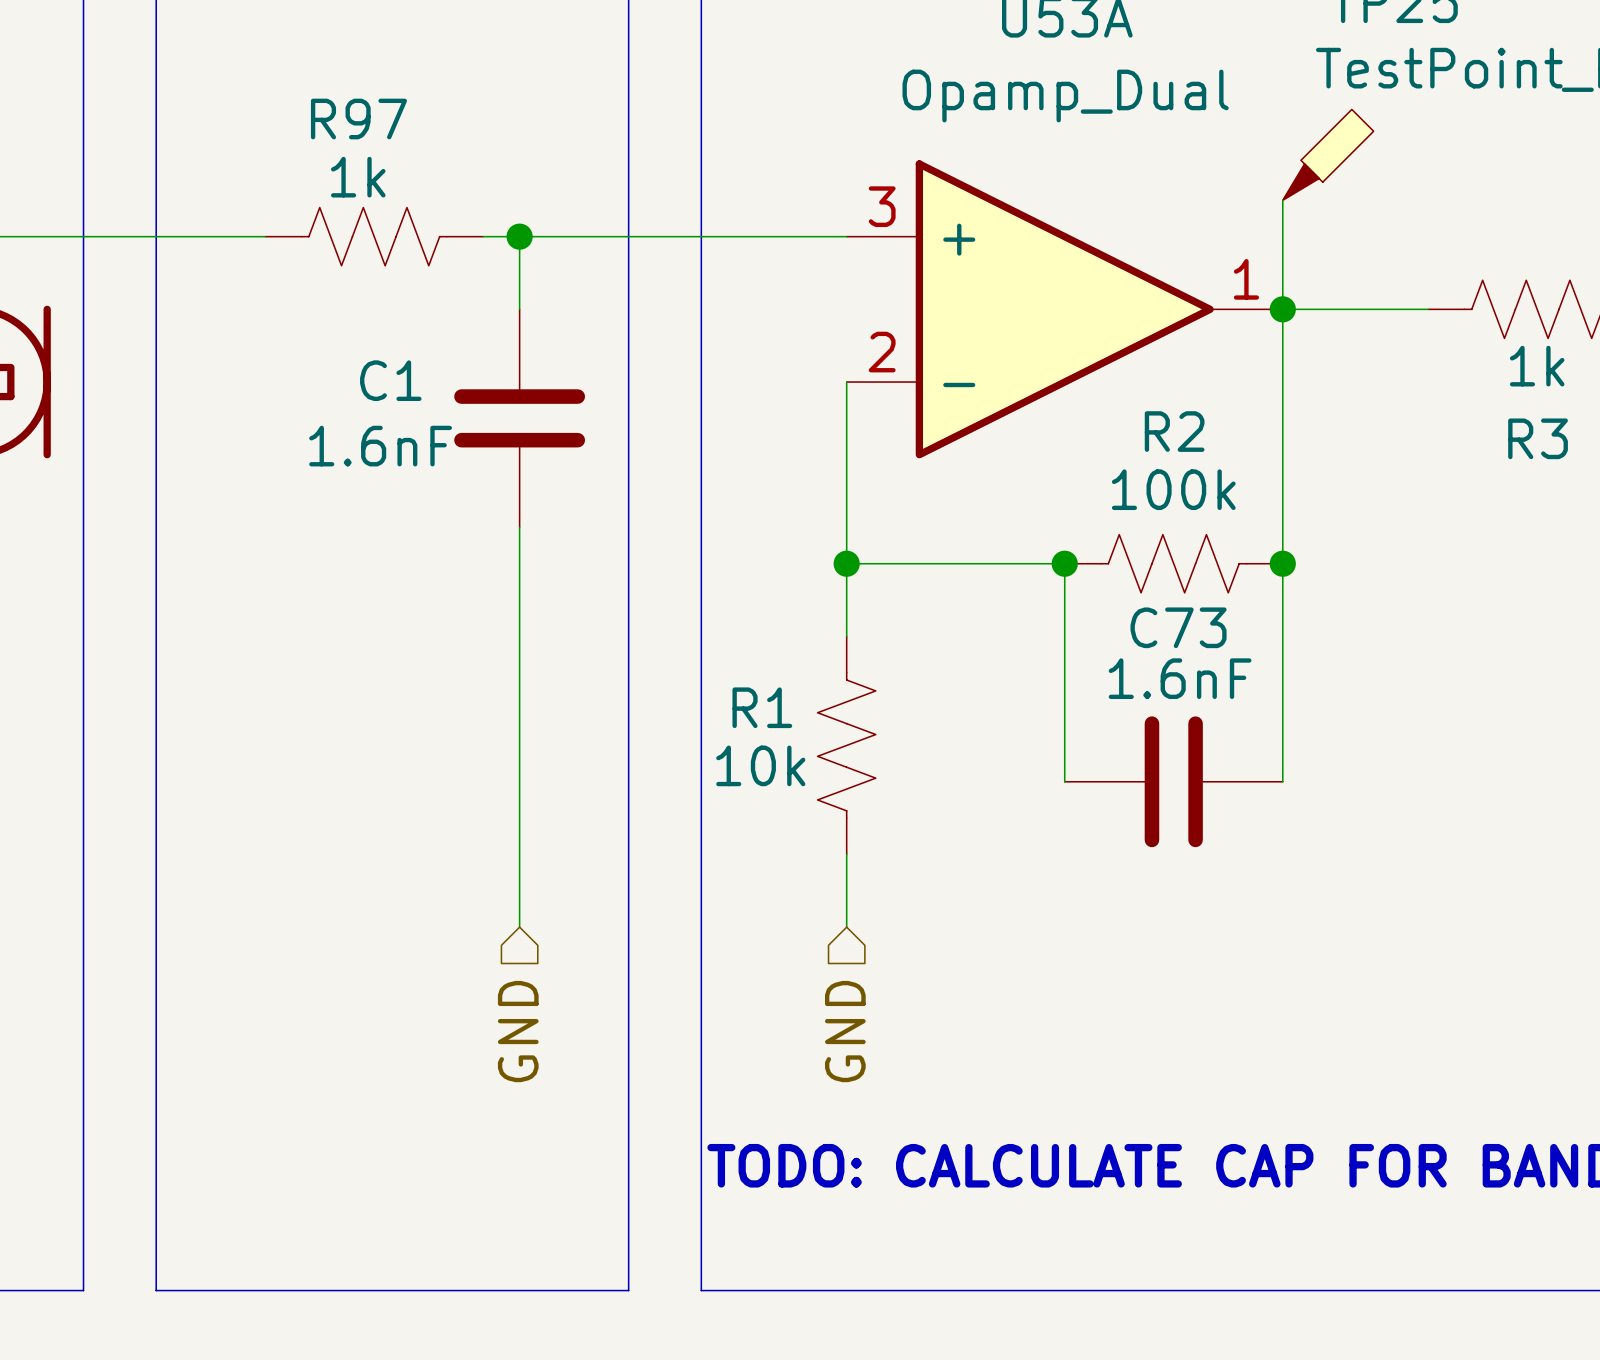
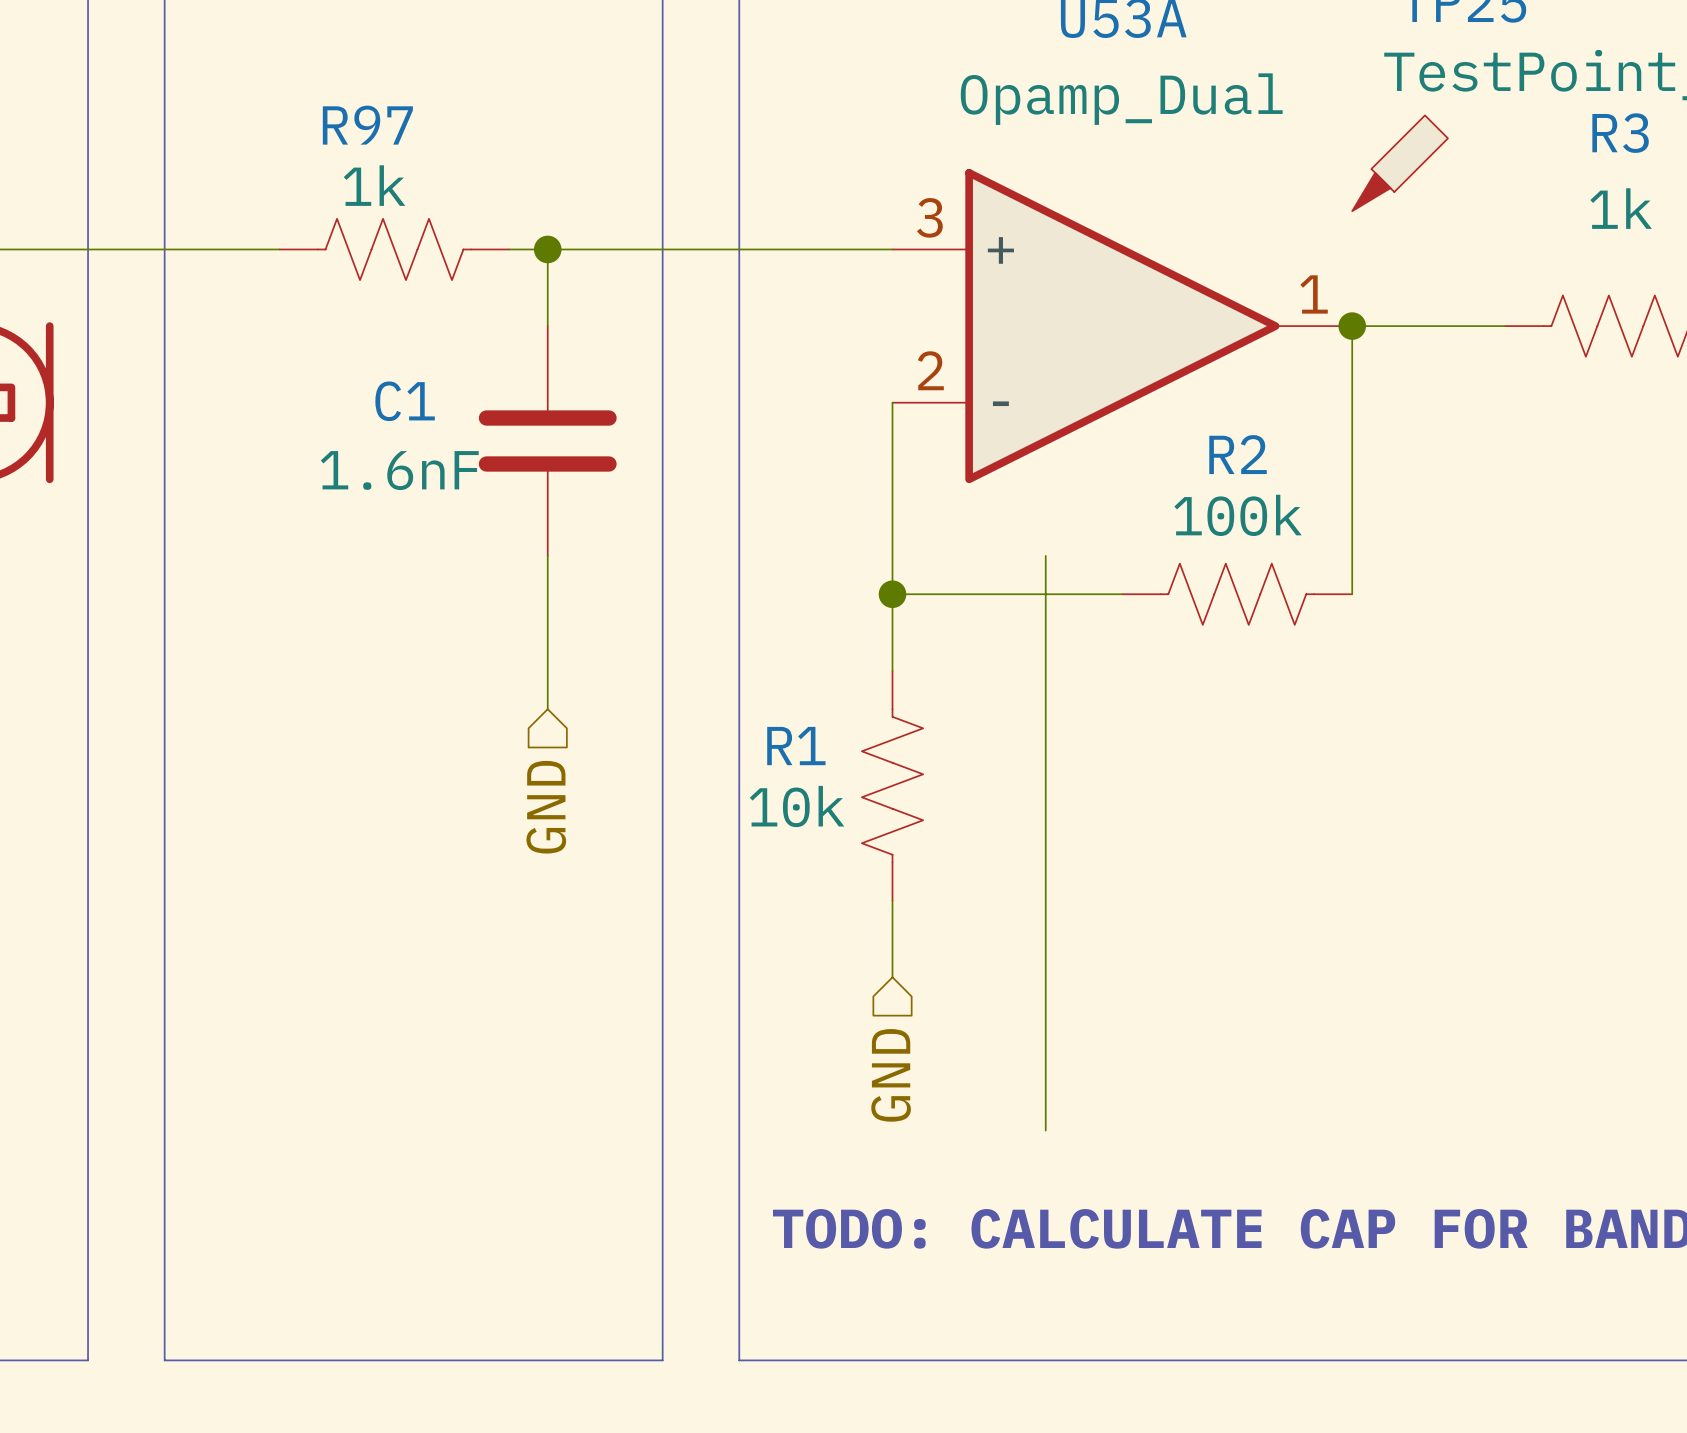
wire: (1282, 200) (1282, 309) -> none
R3 value position: 1k (1537, 366) -> 1k (1621, 208)
R3 name position: R3 (1538, 438) -> R3 (1620, 133)
wire: none -> (1045, 555) (1045, 1130)
wire: (1064, 563) (1064, 781) -> none
junction: (1064, 563) -> none
wire: (1282, 563) (1282, 781) -> none
junction: (1282, 563) -> none
wire: (519, 672) (519, 927) -> none
C73: 1.6nF (1173, 781) -> none
hierarchical label position: GND (518, 1031) -> GND (546, 807)

